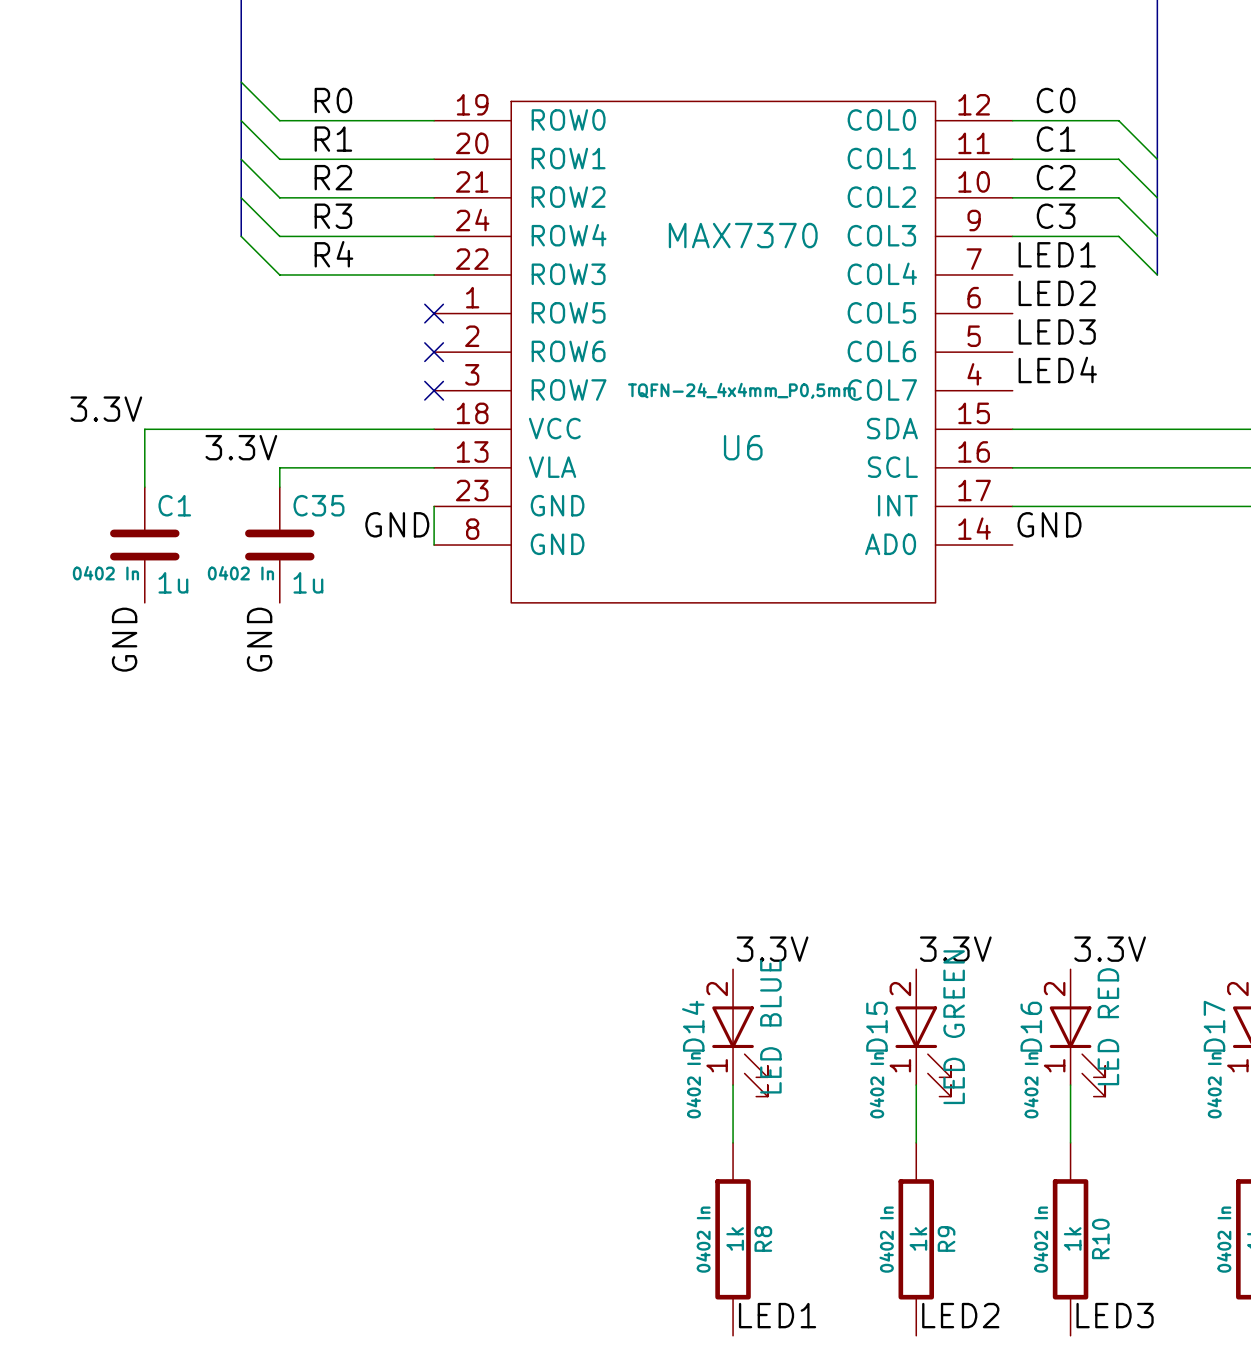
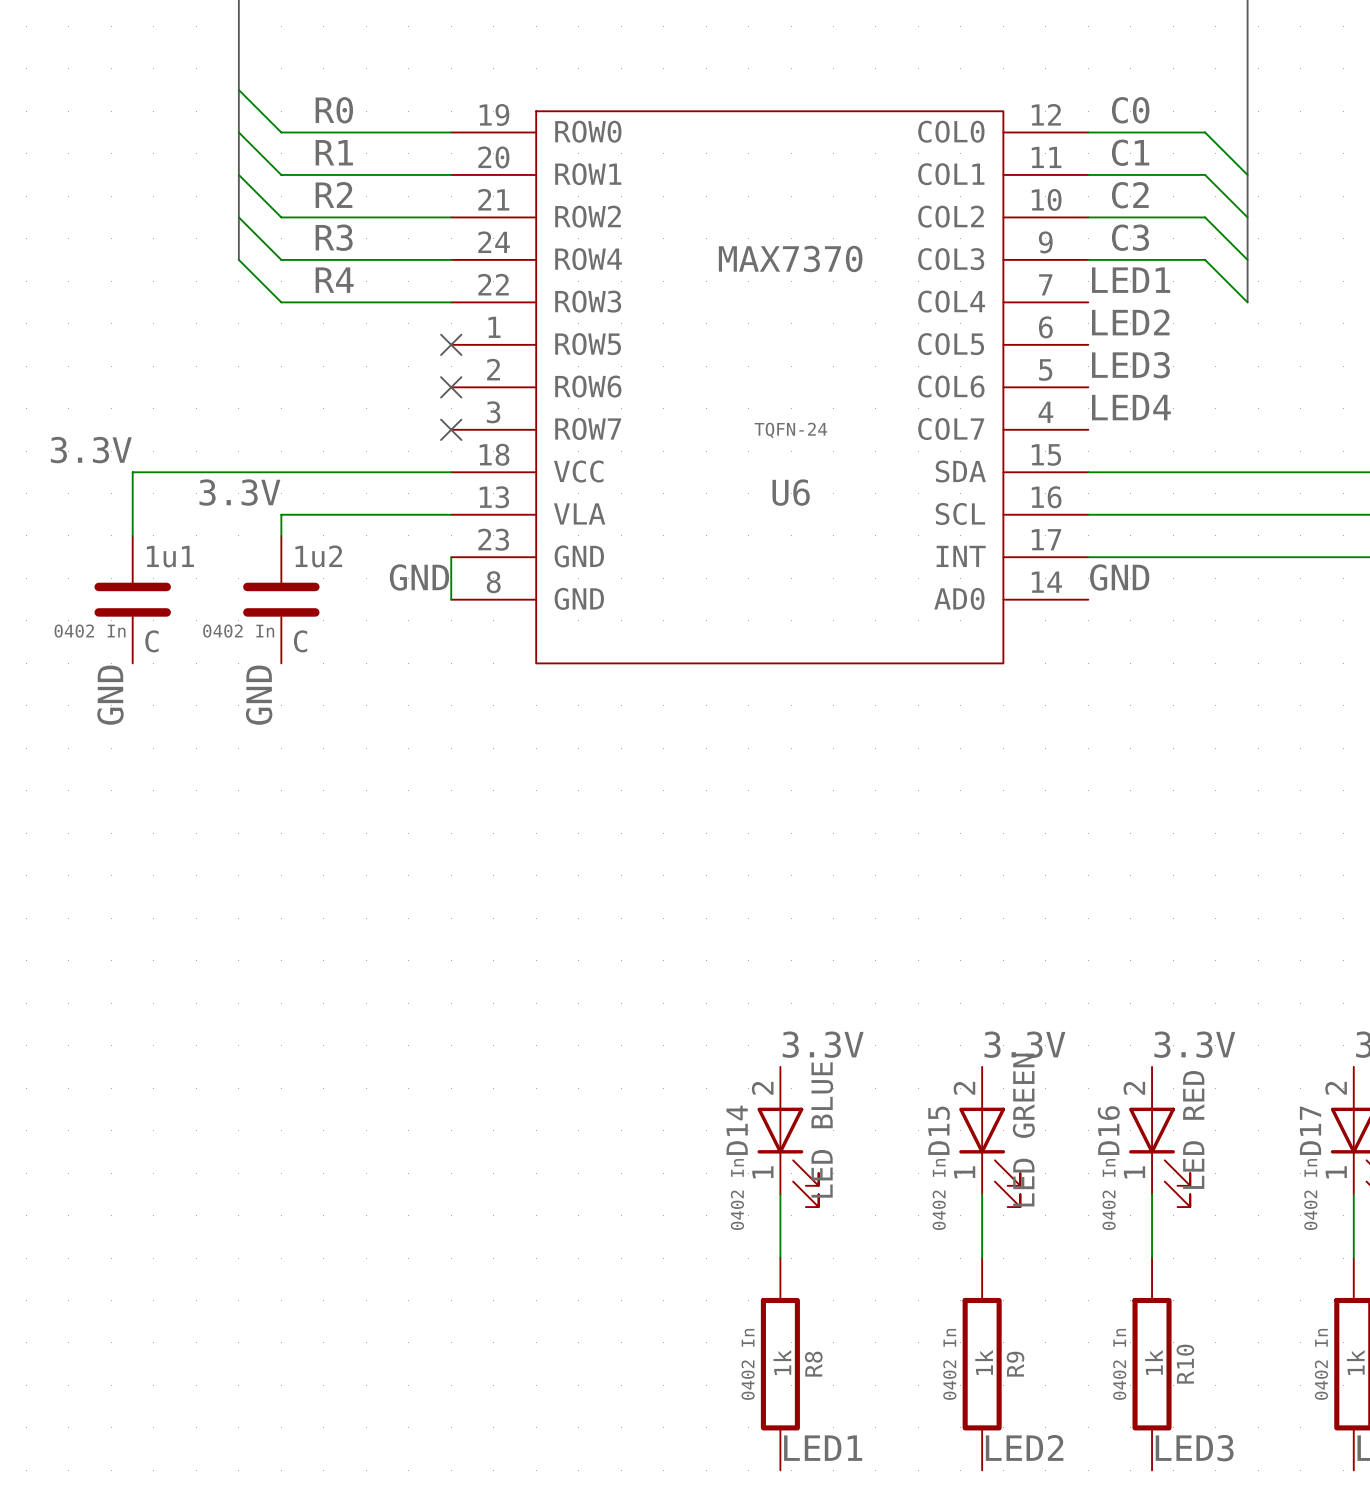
U6 text: TQFN-24_4x4mm_P0,5mm (741, 390) -> TQFN-24 (790, 430)
C1 name: C1 (174, 505) -> 1u1 (170, 556)
C35 name: C35 (318, 505) -> 1u2 (318, 556)
C1 value: 1u (173, 582) -> C (151, 641)
C35 value: 1u (308, 582) -> C (300, 641)

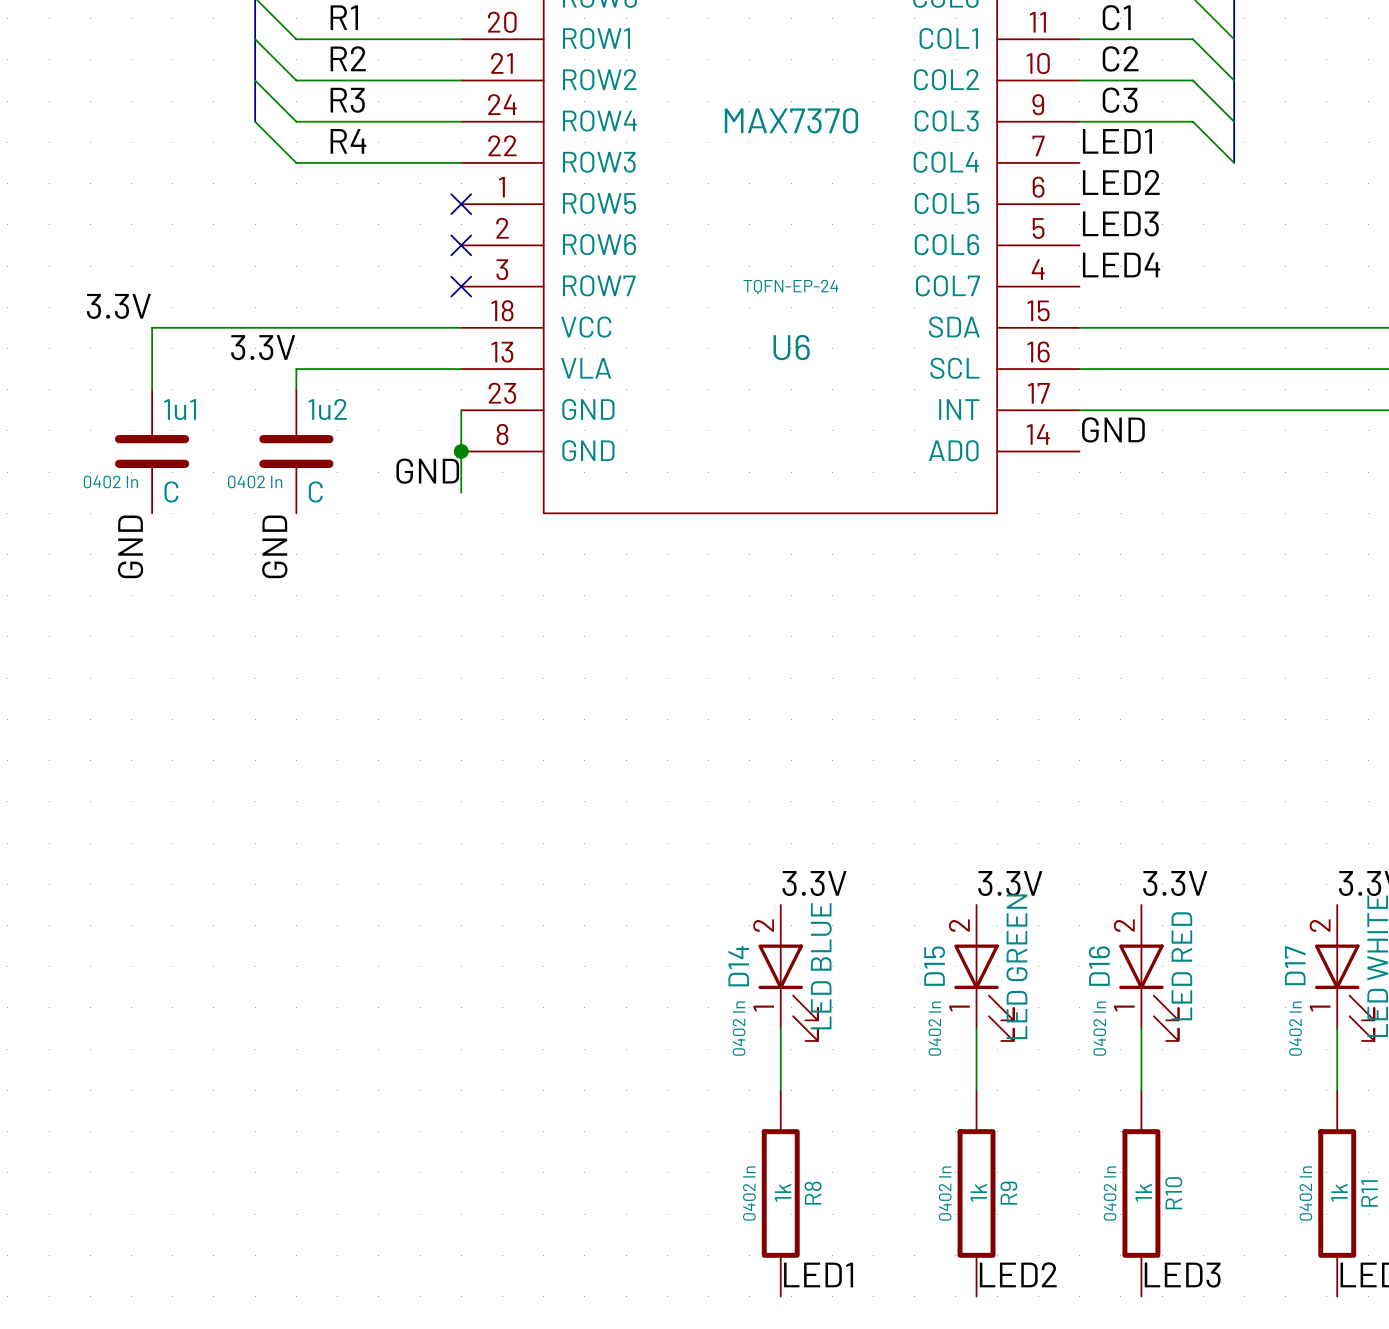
U6 text: TQFN-24 (790, 430) -> TQFN-EP-24 (790, 287)
label position: GND (419, 577) -> GND (427, 471)
wire: none -> (461, 451) (461, 492)
junction: none -> (461, 451)

